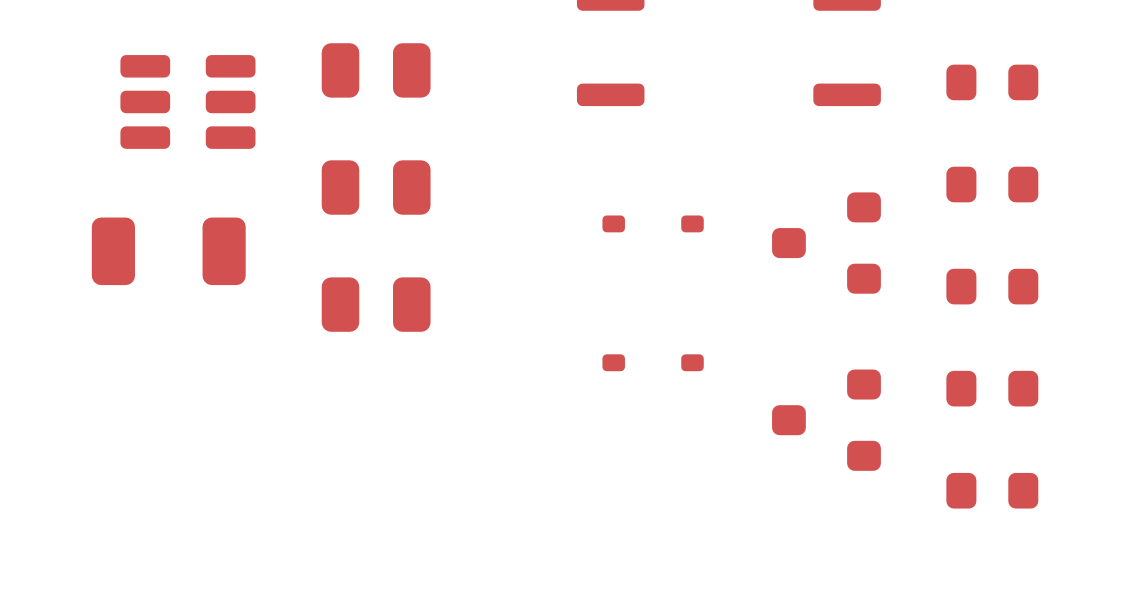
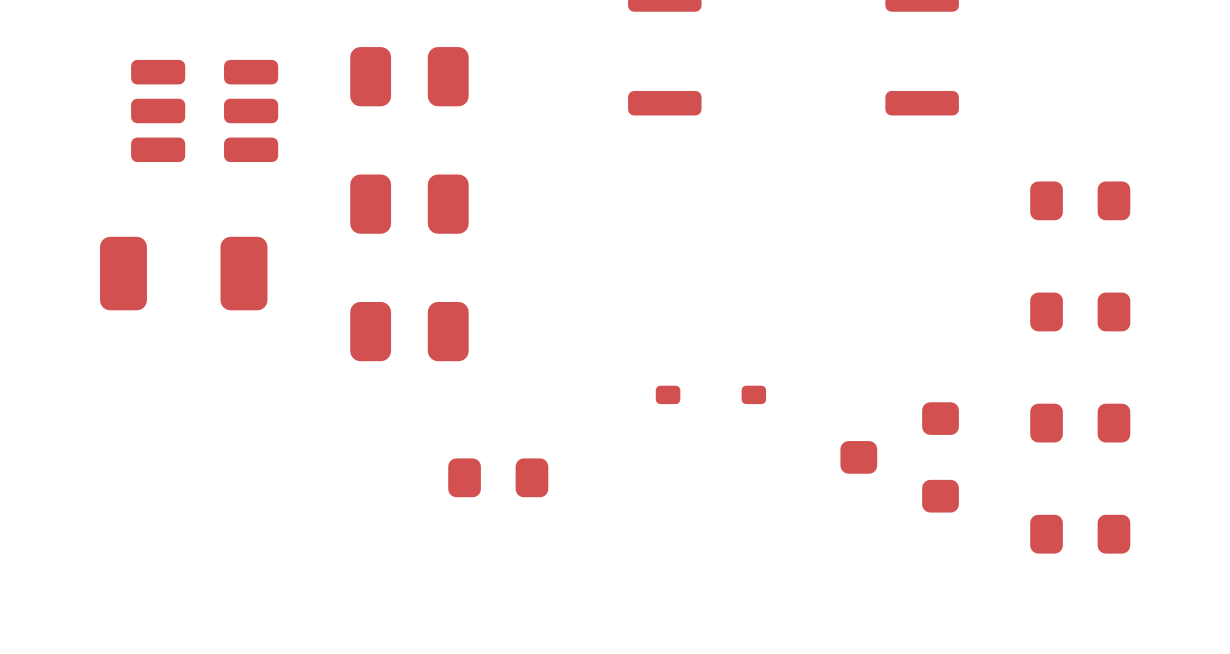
part: (992, 82) -> none
part: (653, 223) -> none
part: (826, 243) -> none
part: none -> (498, 477)

